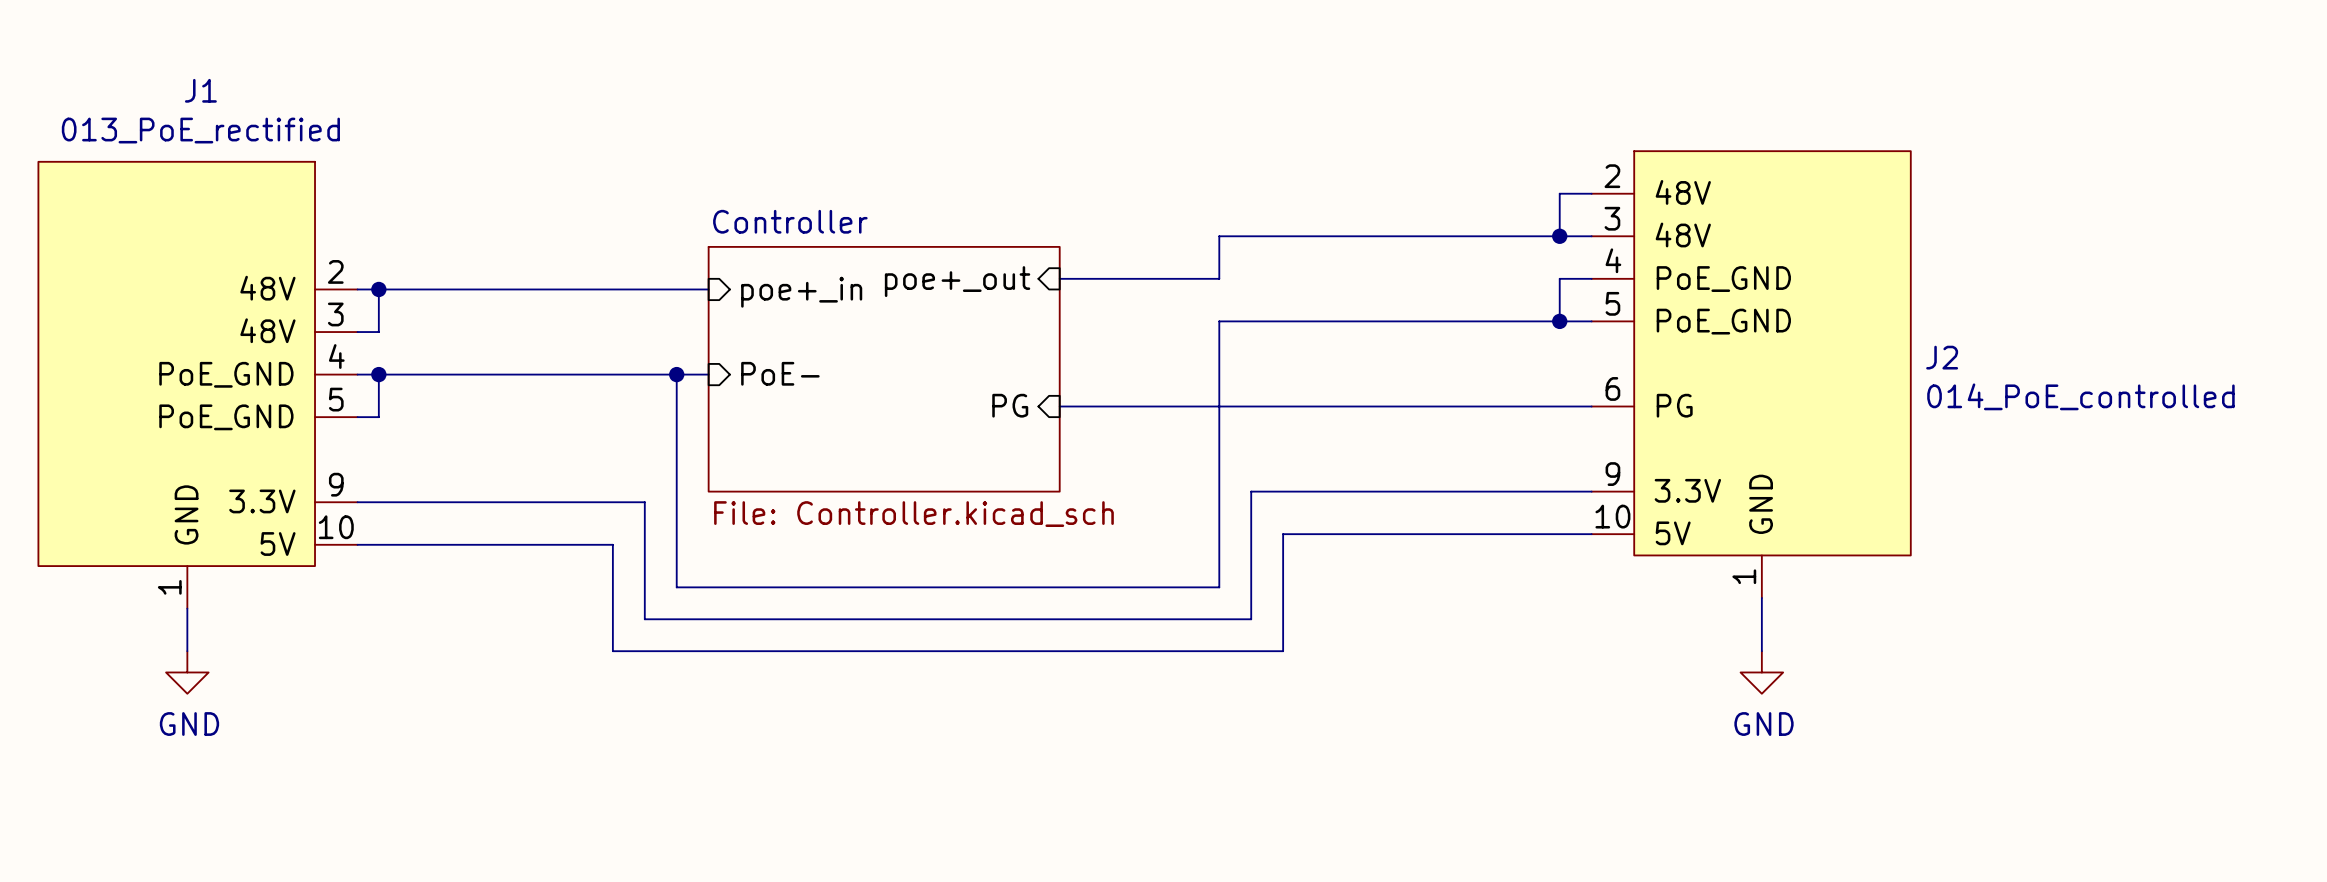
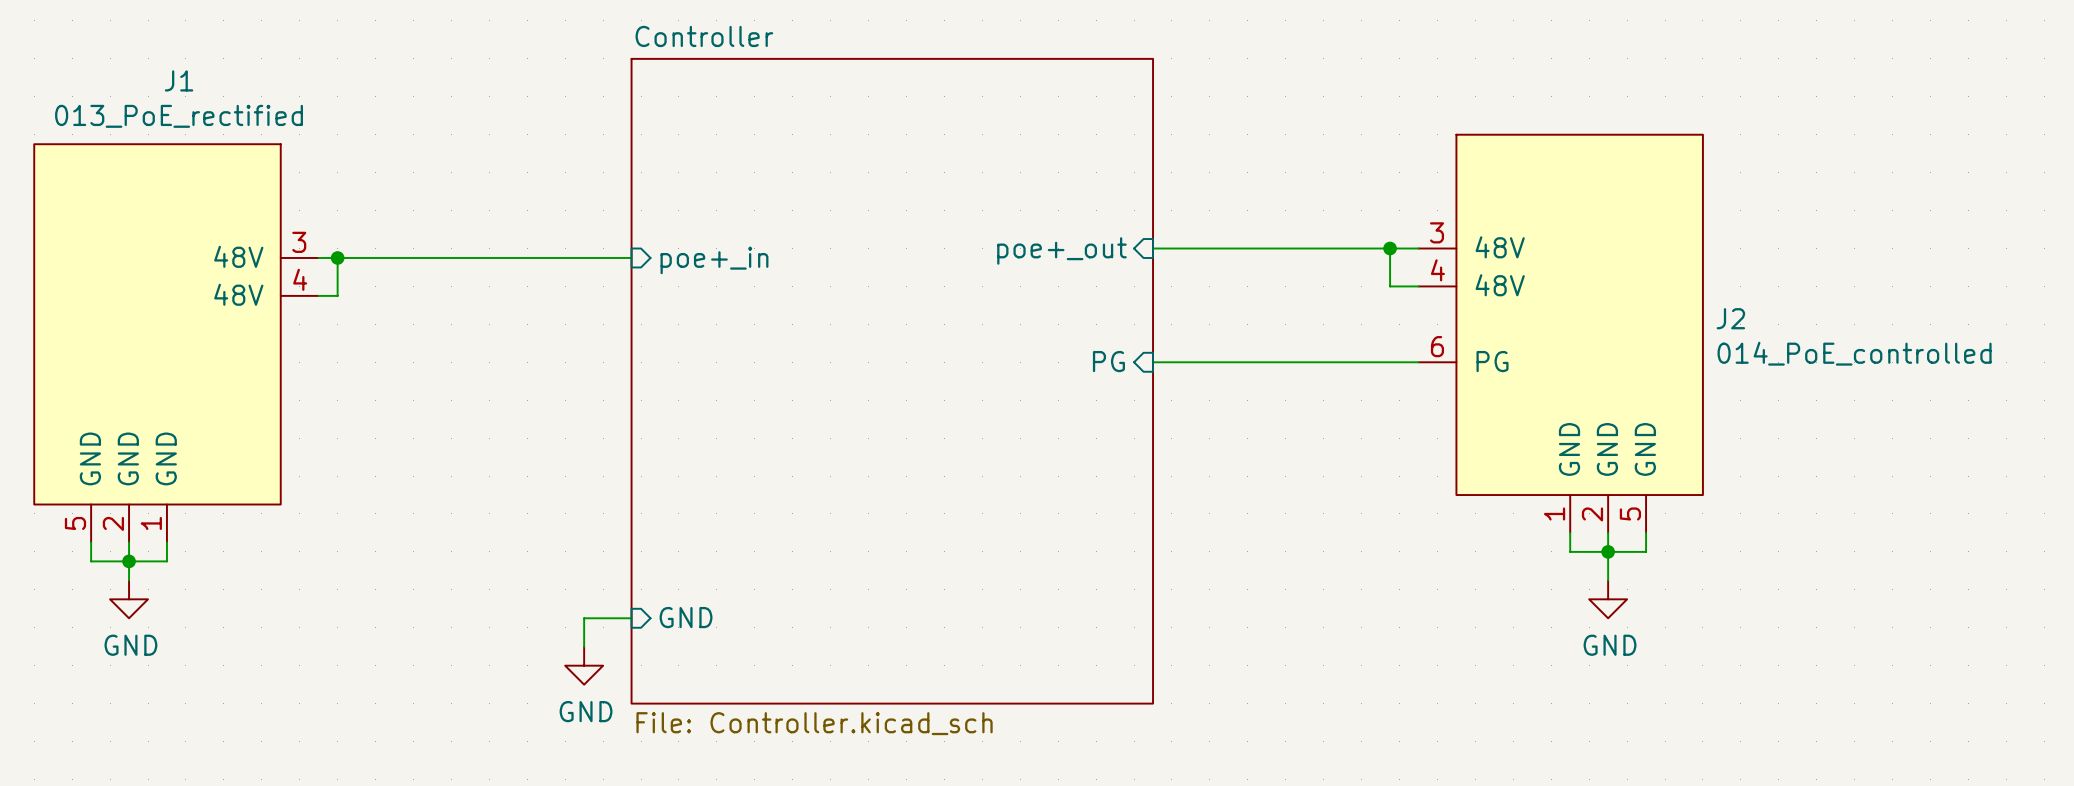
J2 symbol: [1591, 151, 1911, 598] -> [1418, 134, 1703, 533]
J1 symbol: [38, 161, 358, 609] -> [34, 144, 319, 543]
wire: (1591, 193) (1559, 193) (1559, 236) -> none
junction: (1559, 236) -> none
wire: (1591, 236) (1219, 236) (1219, 278) (1059, 278) -> none
wire: none -> (1153, 248) (1390, 248)
junction: none -> (1390, 248)
sheet pin position: poe+_out (957, 281) -> poe+_out (1061, 250)
wire: (1559, 321) (1219, 321) (1219, 587) (676, 587) (676, 374) -> none
junction: (1559, 321) -> none
sheet Controller: File: Controller.kicad_sch (884, 369) -> none
sheet pin: PoE- (780, 373) -> none
wire: (357, 374) (708, 374) -> none
wire: (378, 374) (378, 417) (357, 417) -> none
junction: (378, 374) -> none
junction: (676, 374) -> none
sheet pin position: PG (1010, 405) -> PG (1108, 361)
wire: (1059, 406) (1293, 406) -> none
sheet Controller: none -> File: Controller.kicad_sch (892, 381)
wire: (1591, 491) (1251, 491) (1251, 619) (644, 619) (644, 502) (357, 502) -> none
wire: (1591, 534) (1283, 534) (1283, 651) (612, 651) (612, 544) (357, 544) -> none
wire: none -> (1608, 532) (1608, 580)
wire: none -> (129, 542) (129, 580)
wire: (1761, 619) (1761, 651) -> (1570, 551) (1646, 551) (1646, 532)
junction: none -> (1608, 551)
junction: none -> (129, 561)
wire: (187, 629) (187, 651) -> (166, 561) (91, 561) (91, 542)
power symbol position: GND (187, 672) -> GND (129, 599)
power symbol position: GND (1761, 672) -> GND (1608, 599)
sheet pin: none -> GND (686, 617)
wire: none -> (631, 618) (584, 618) (584, 646)
power symbol: none -> GND (584, 665)

